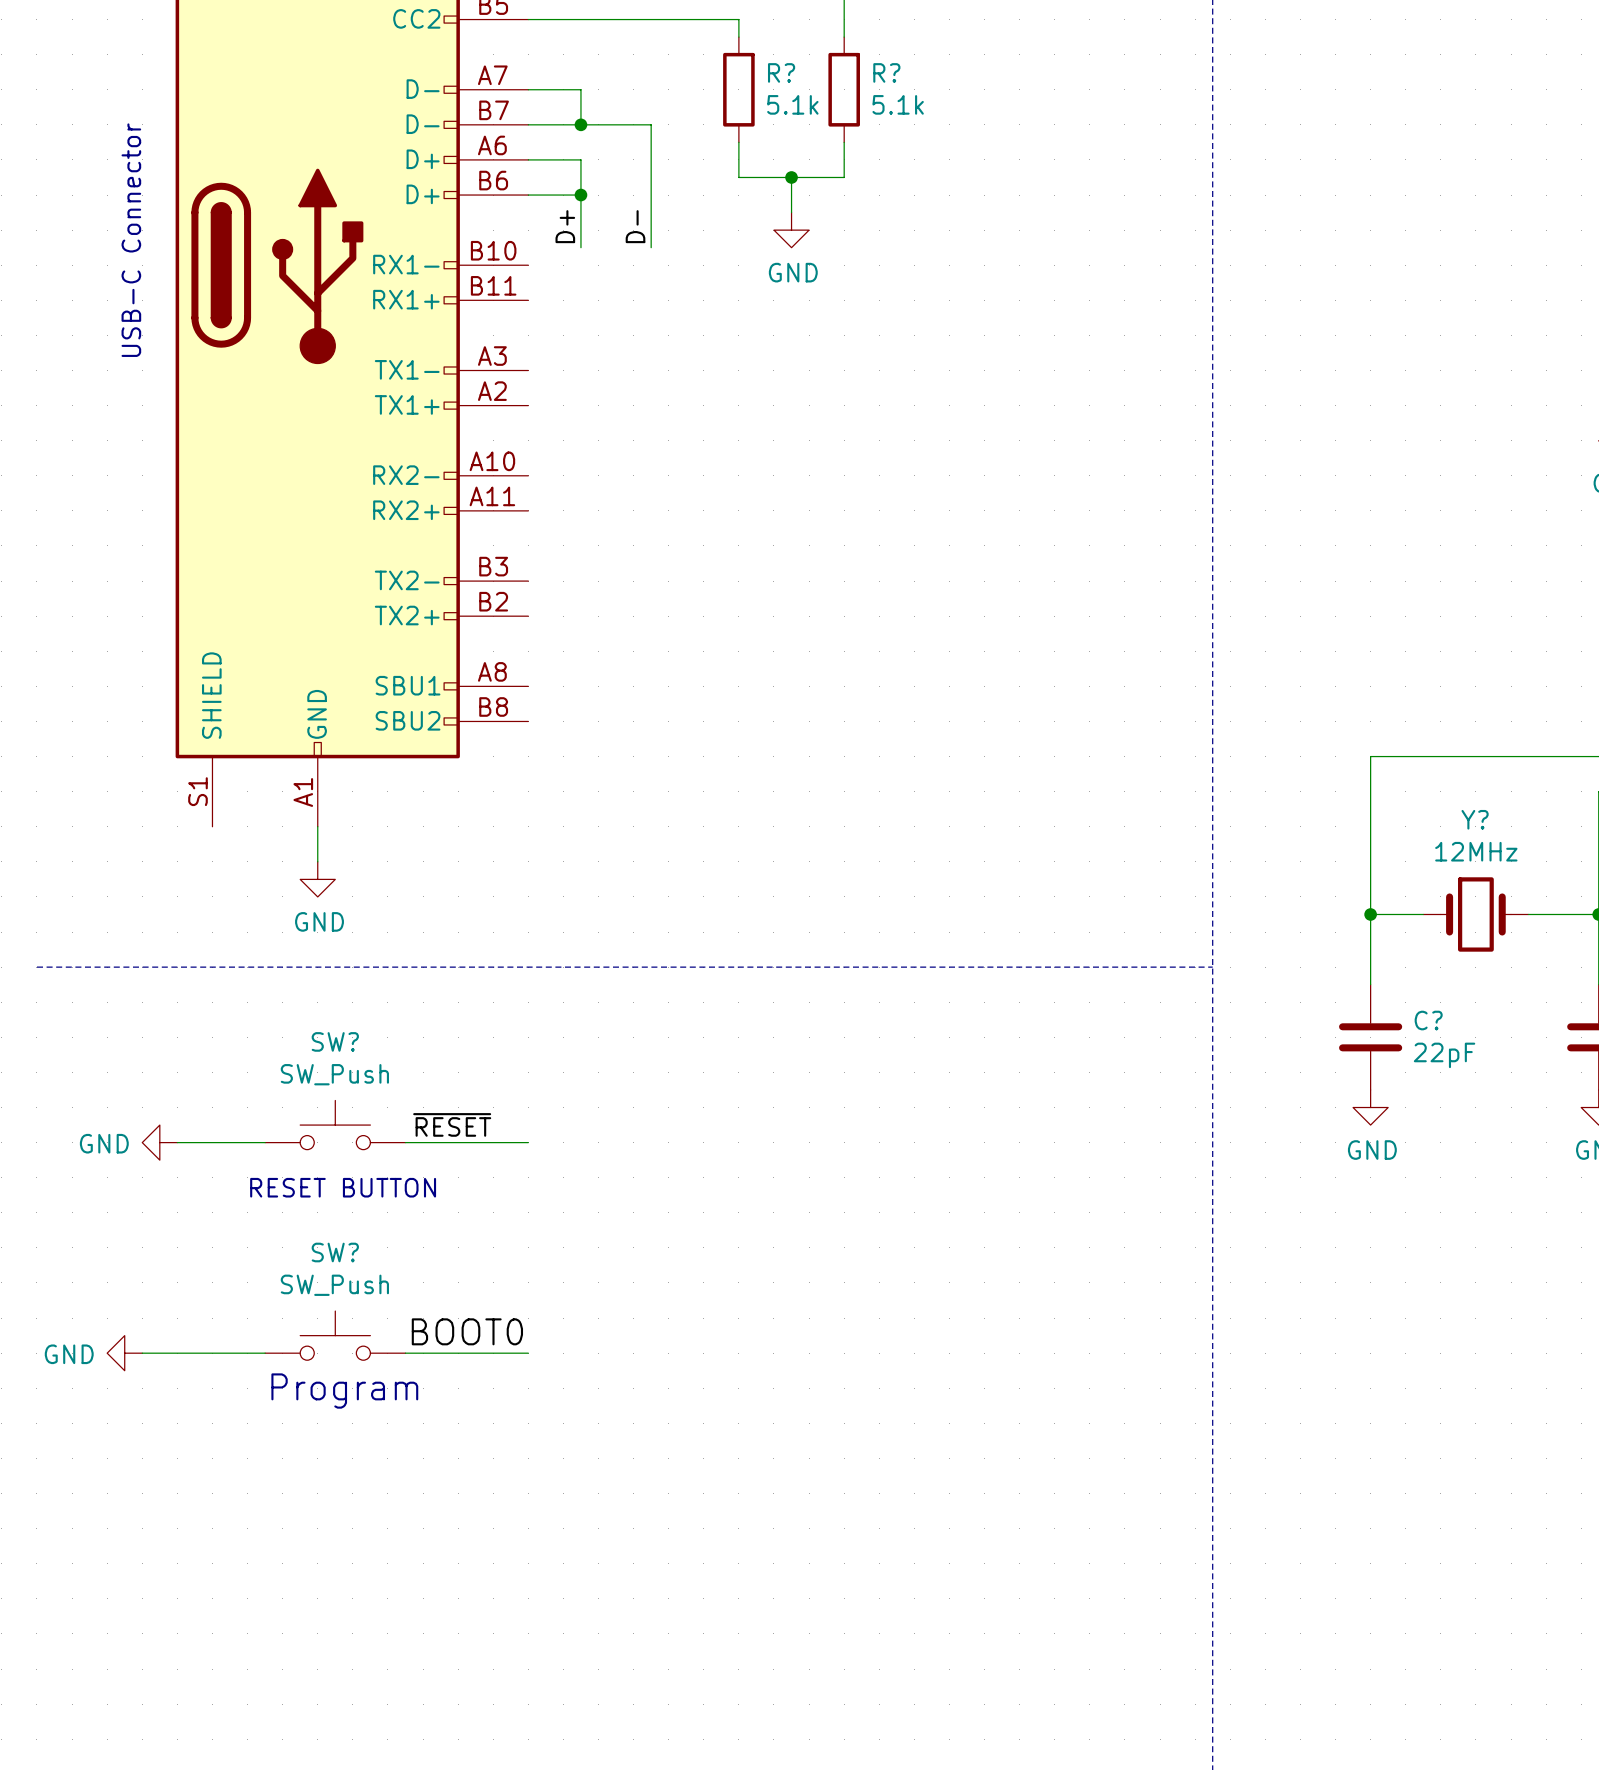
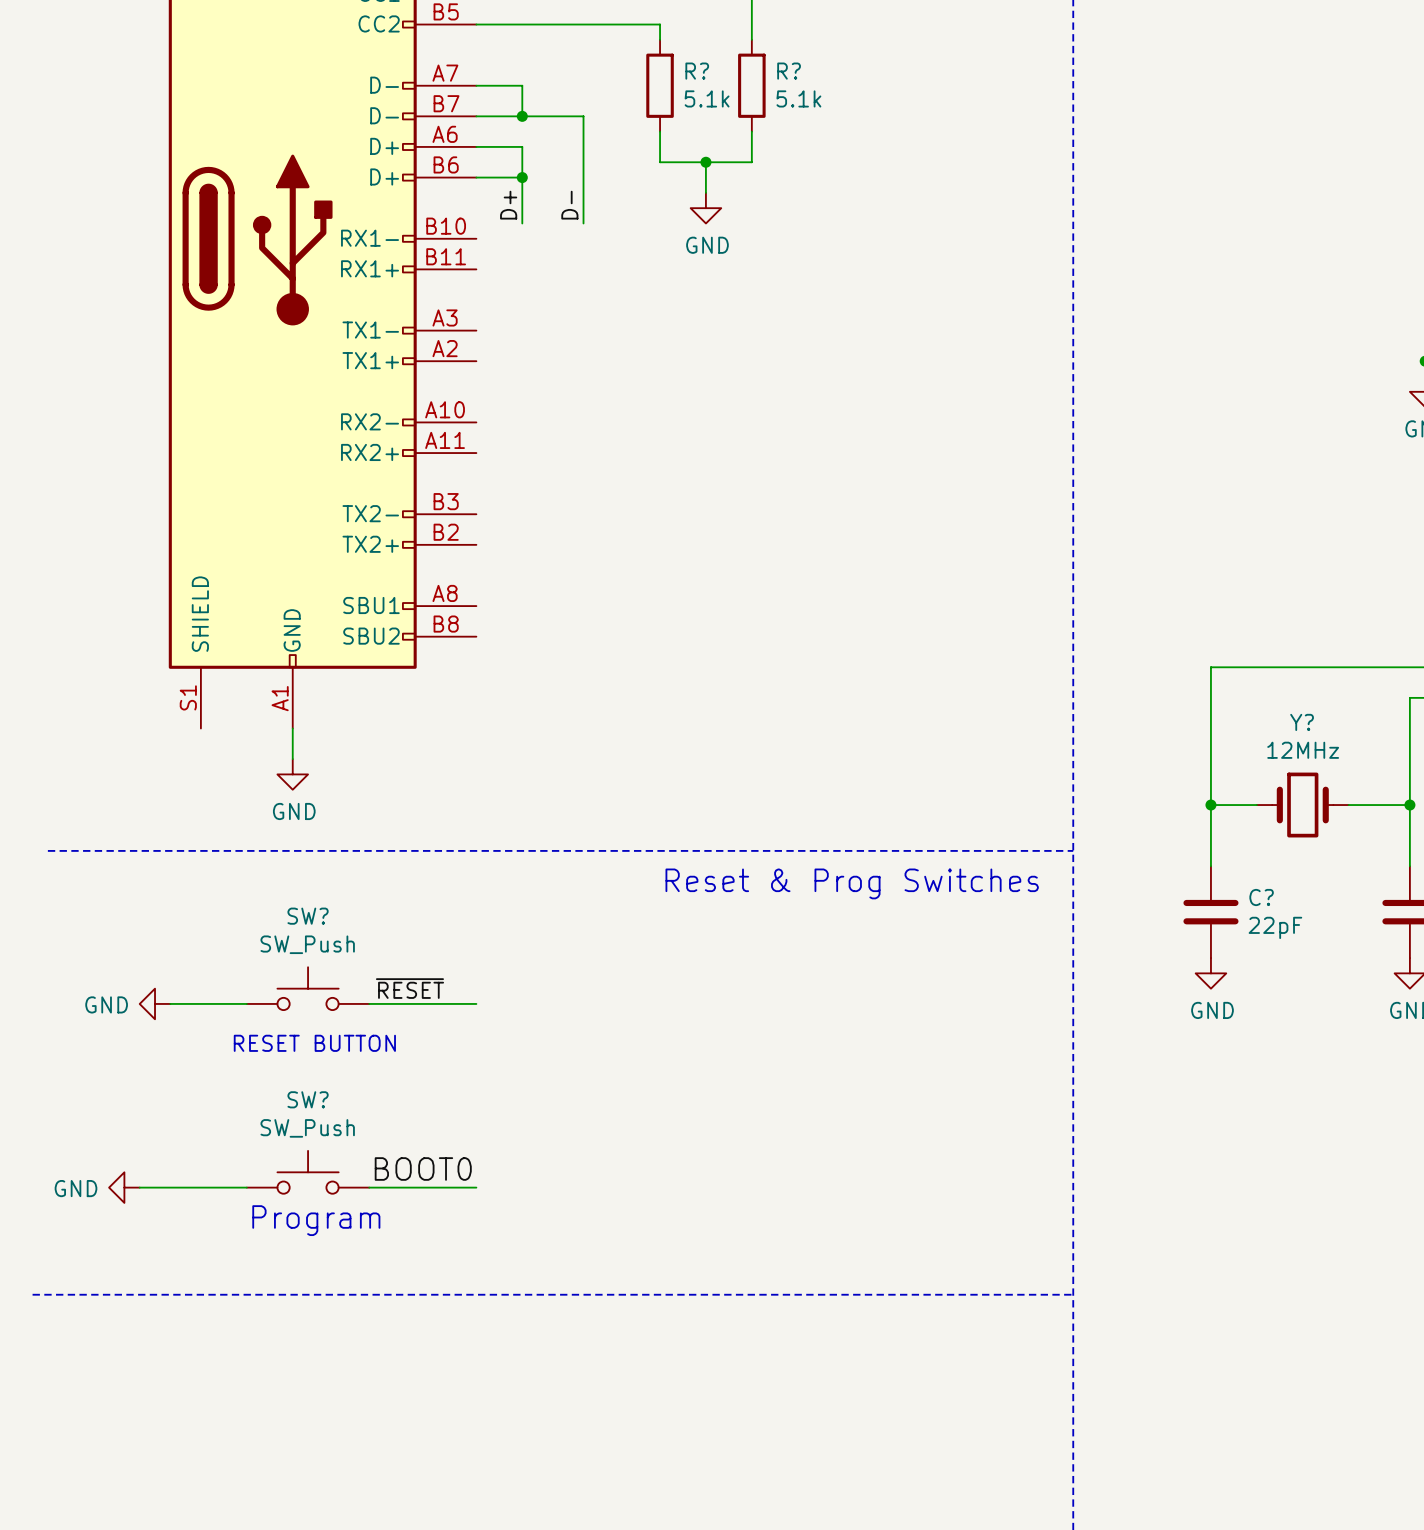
text: USB-C Connector (131, 240) -> none
text: none -> Reset & Prog Switches (852, 883)
line: none -> (32, 1294) (1073, 1294)

